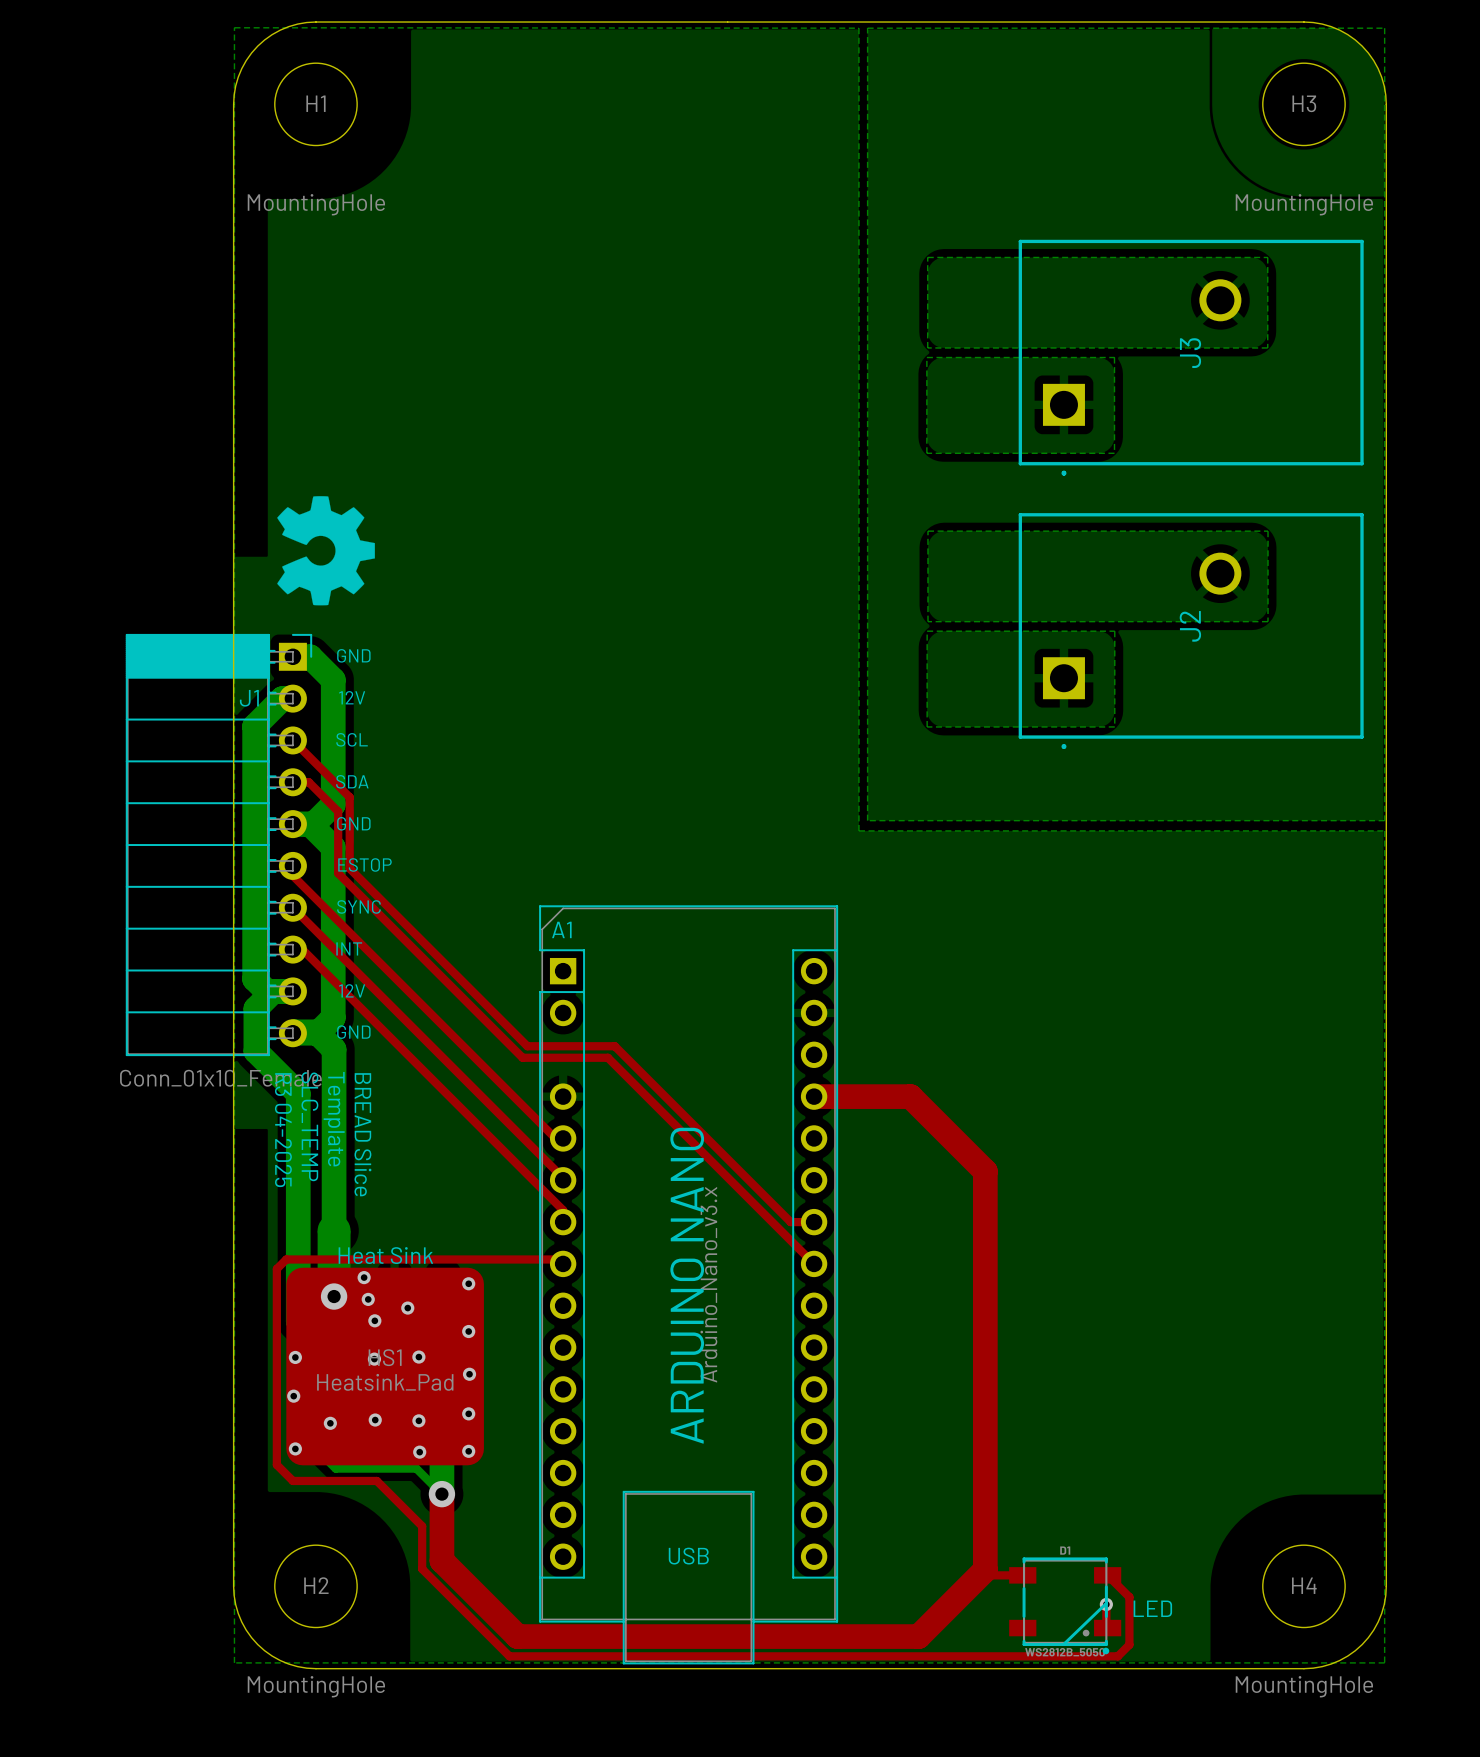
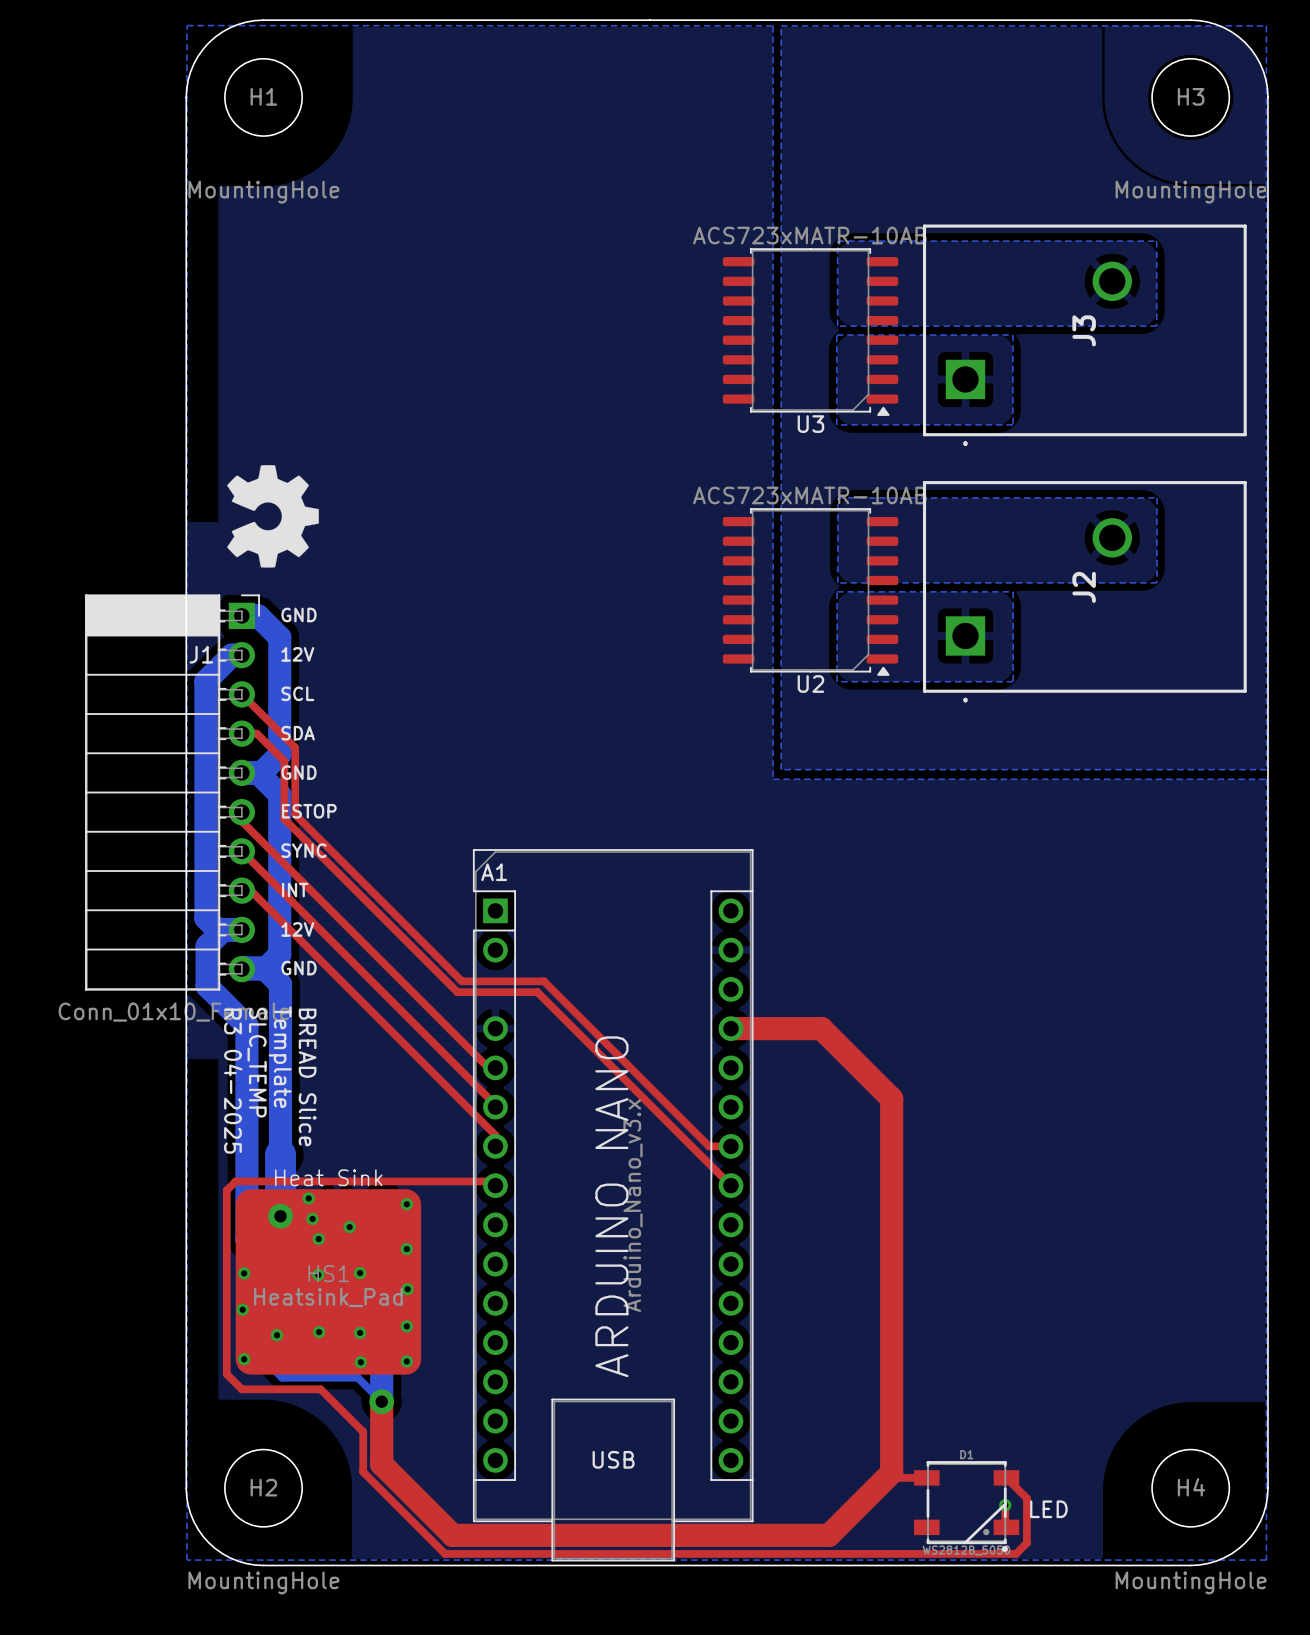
U3: none -> ACS723xMATR-10AB (810, 332)
U2: none -> ACS723xMATR-10AB (810, 591)

